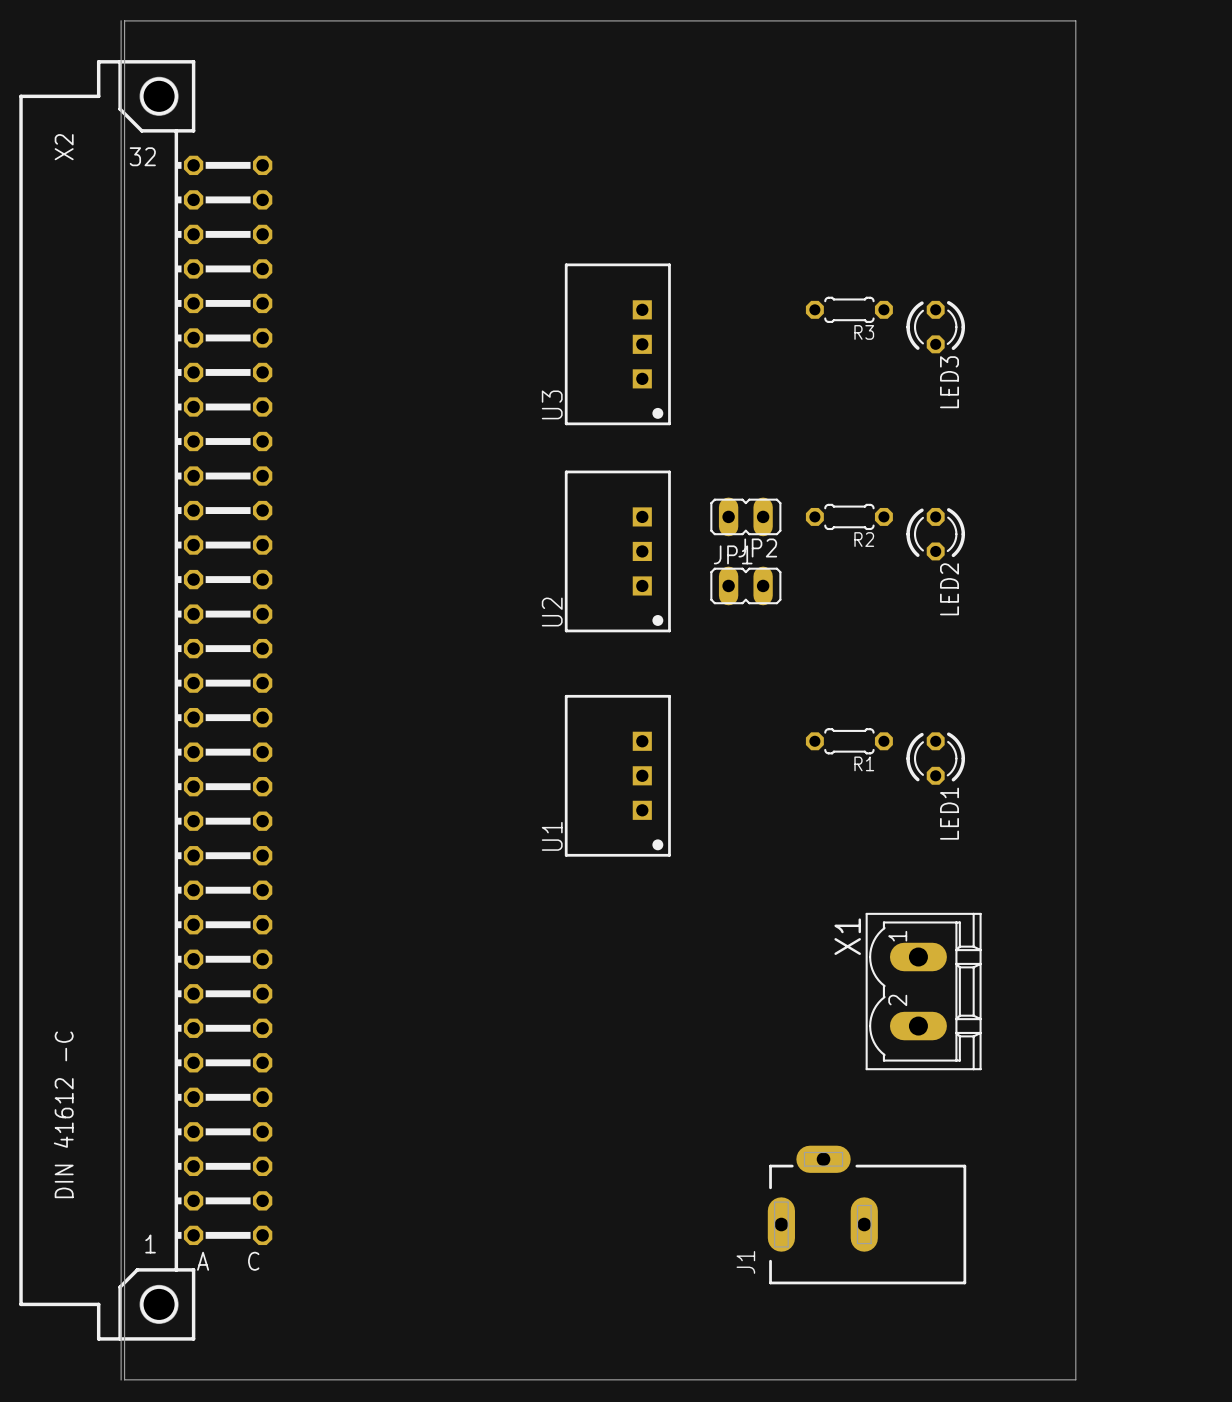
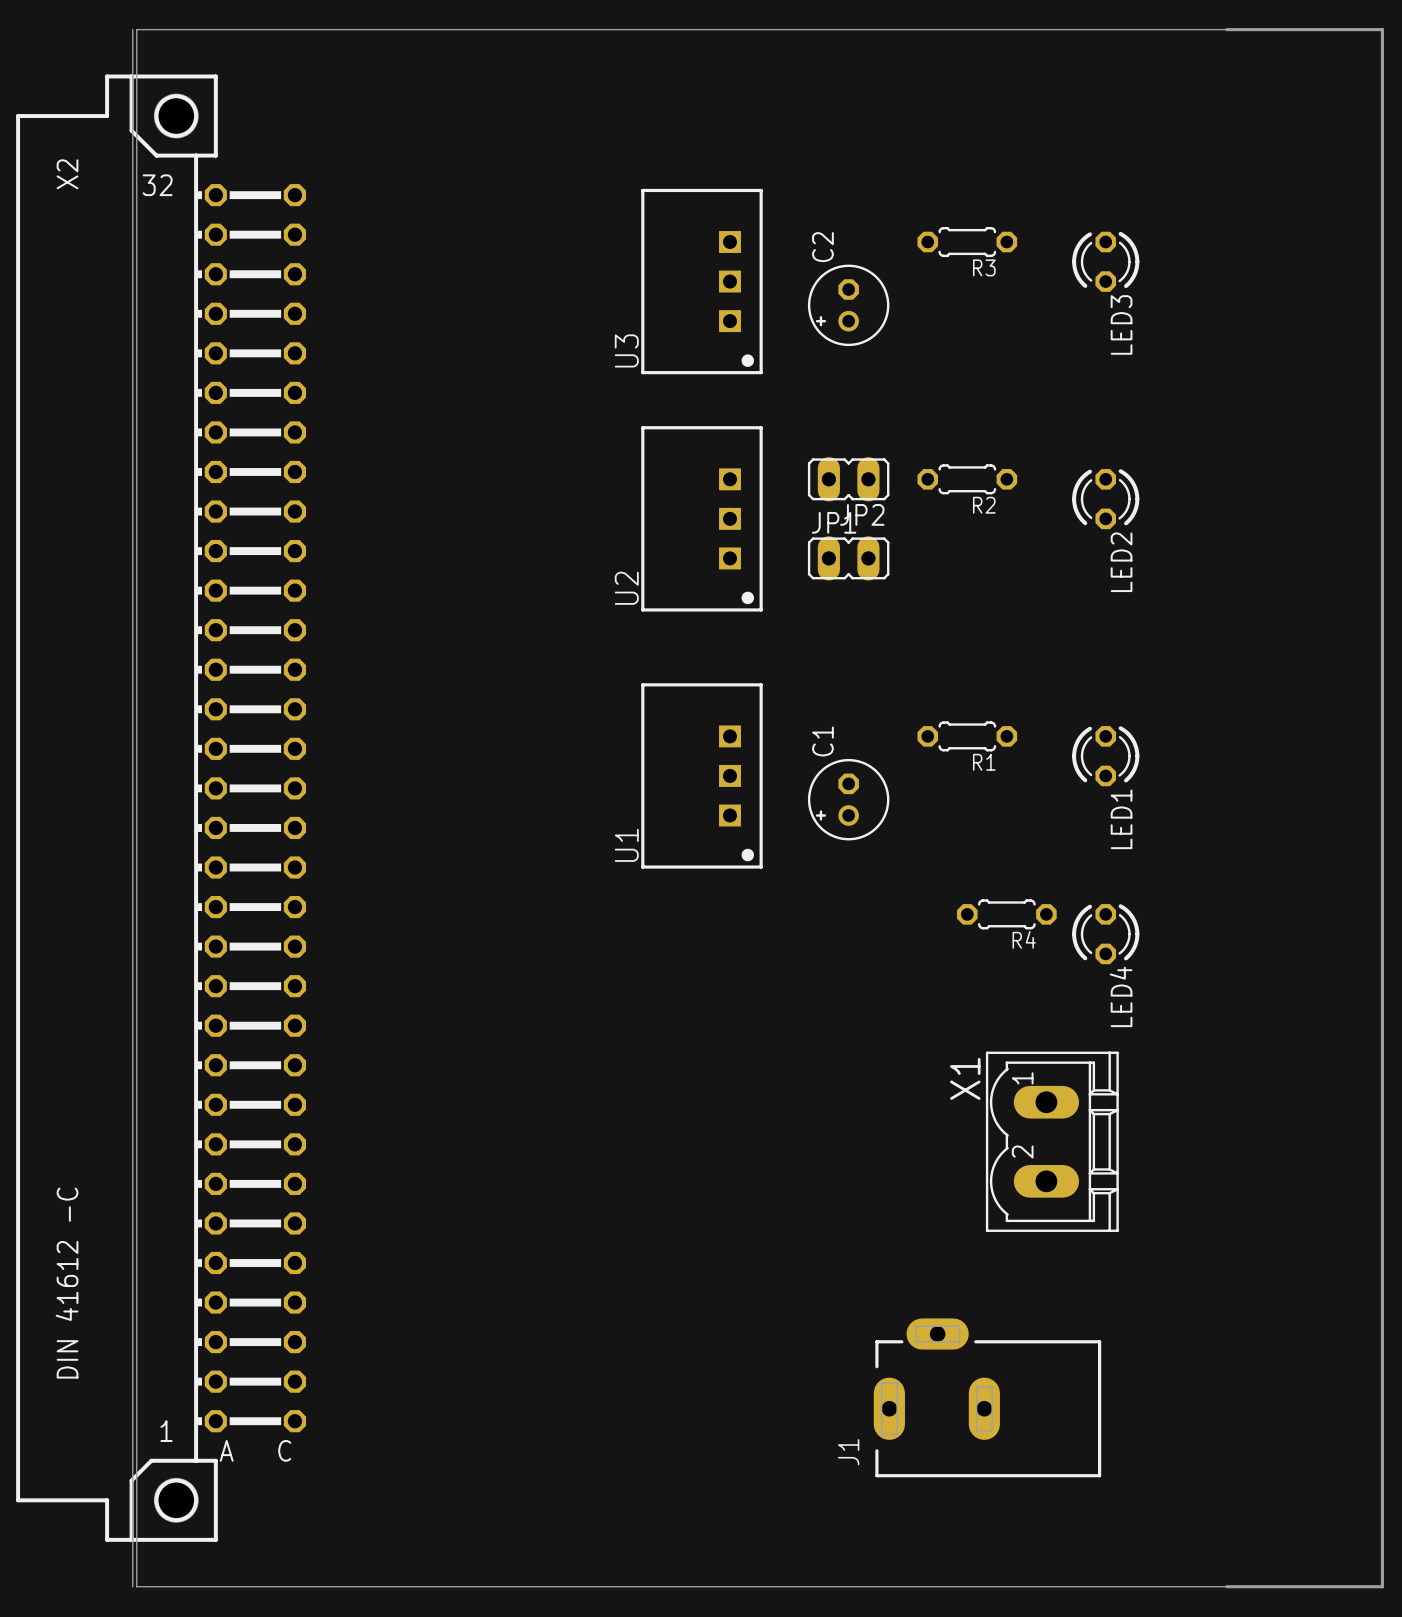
board edge: (1075, 20) (1075, 1379) -> (1226, 29) (1382, 29) (1382, 1586) (1226, 1586)
C2: none -> (848, 305)
R3 position: (849, 309) -> (967, 242)
LED3 position: (935, 327) -> (1105, 261)
U3 position: (617, 344) -> (701, 281)
JP2 position: (745, 516) -> (848, 479)
R2 position: (849, 516) -> (967, 479)
LED2 position: (935, 534) -> (1105, 499)
U2 position: (617, 551) -> (701, 518)
JP1 position: (745, 585) -> (848, 558)
C1: none -> (848, 799)
R1 position: (849, 741) -> (967, 736)
LED1 position: (935, 758) -> (1105, 756)
U1 position: (617, 775) -> (701, 775)
R4: none -> (1006, 914)
LED4: none -> (1105, 934)

